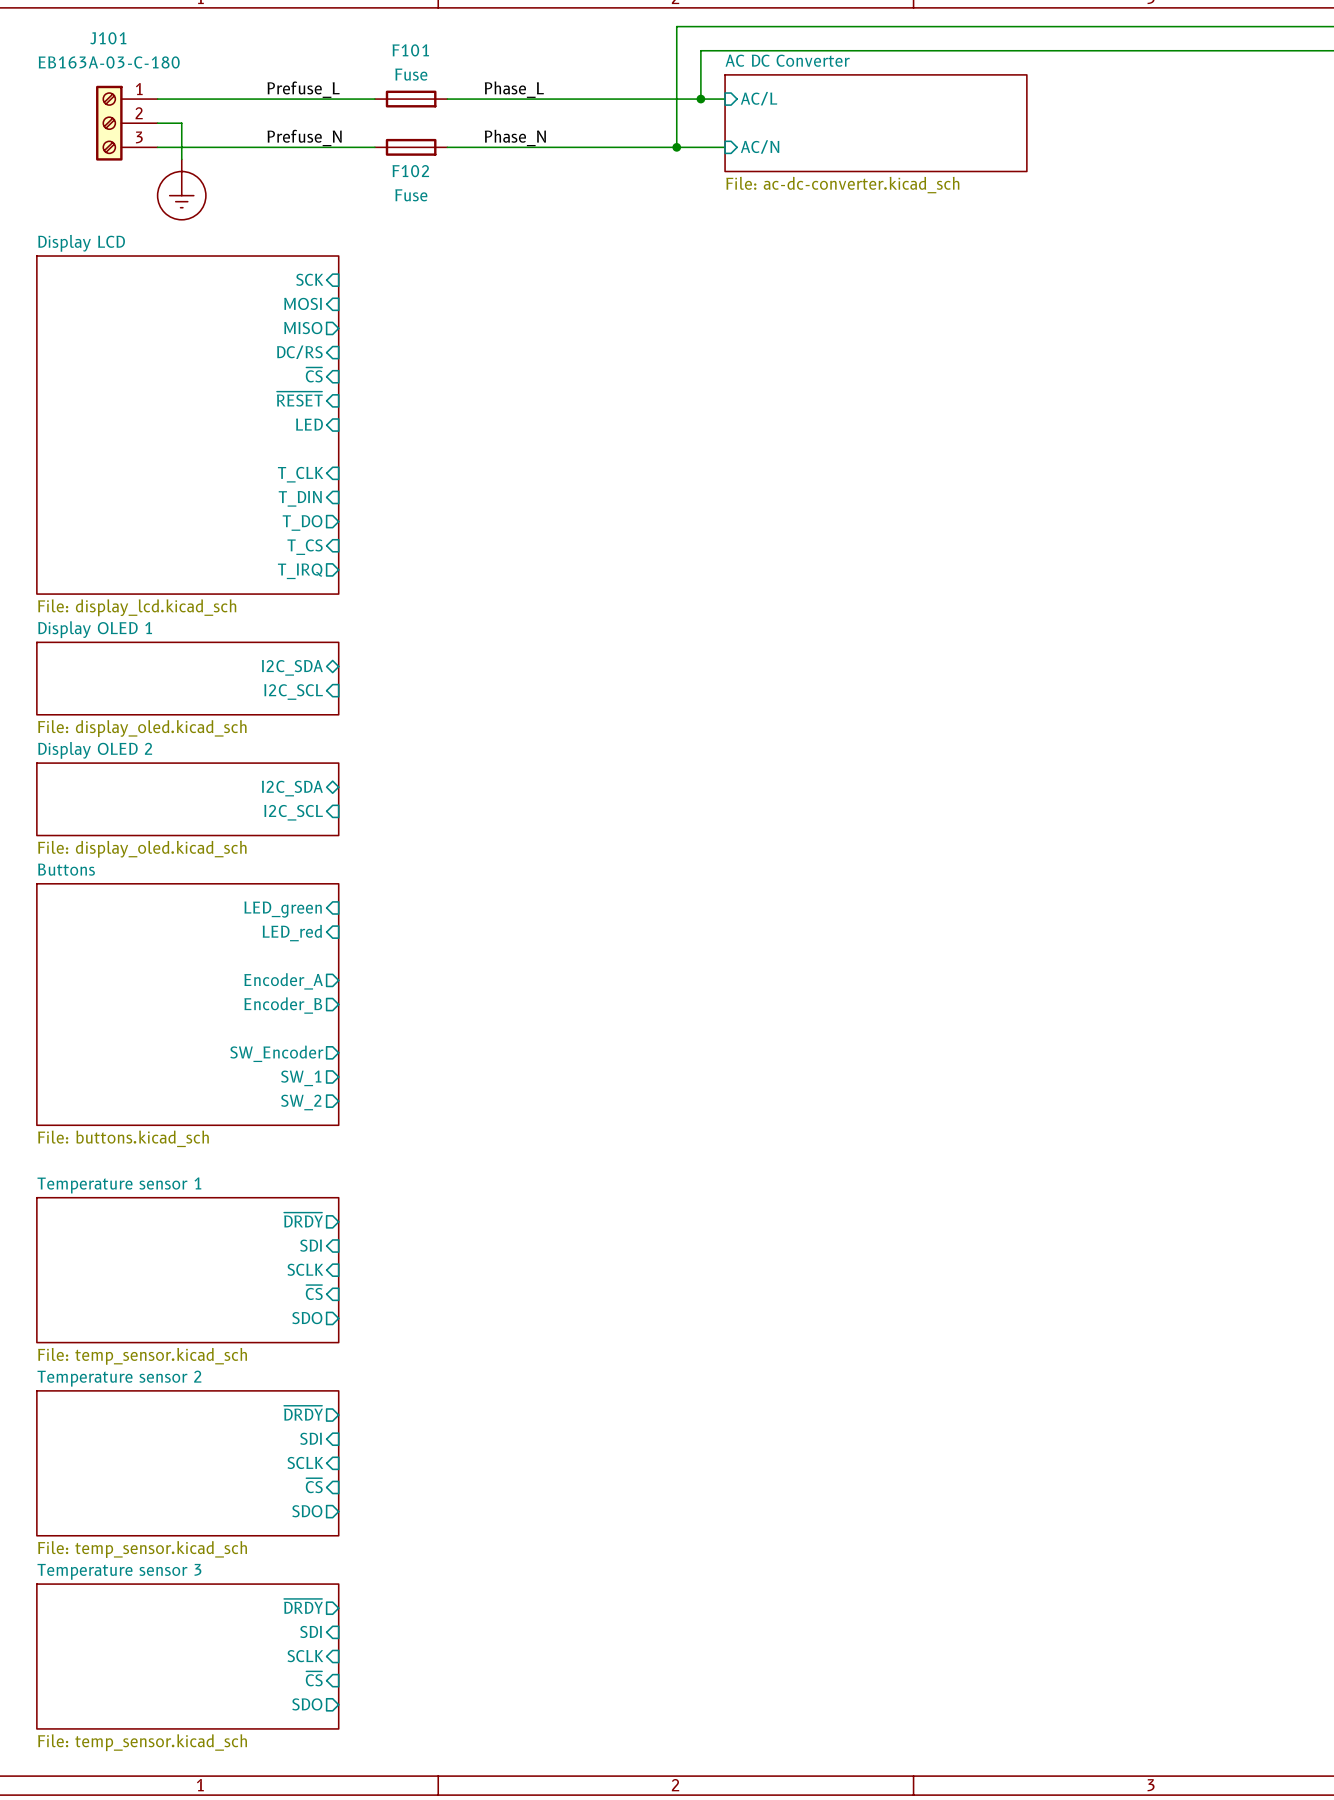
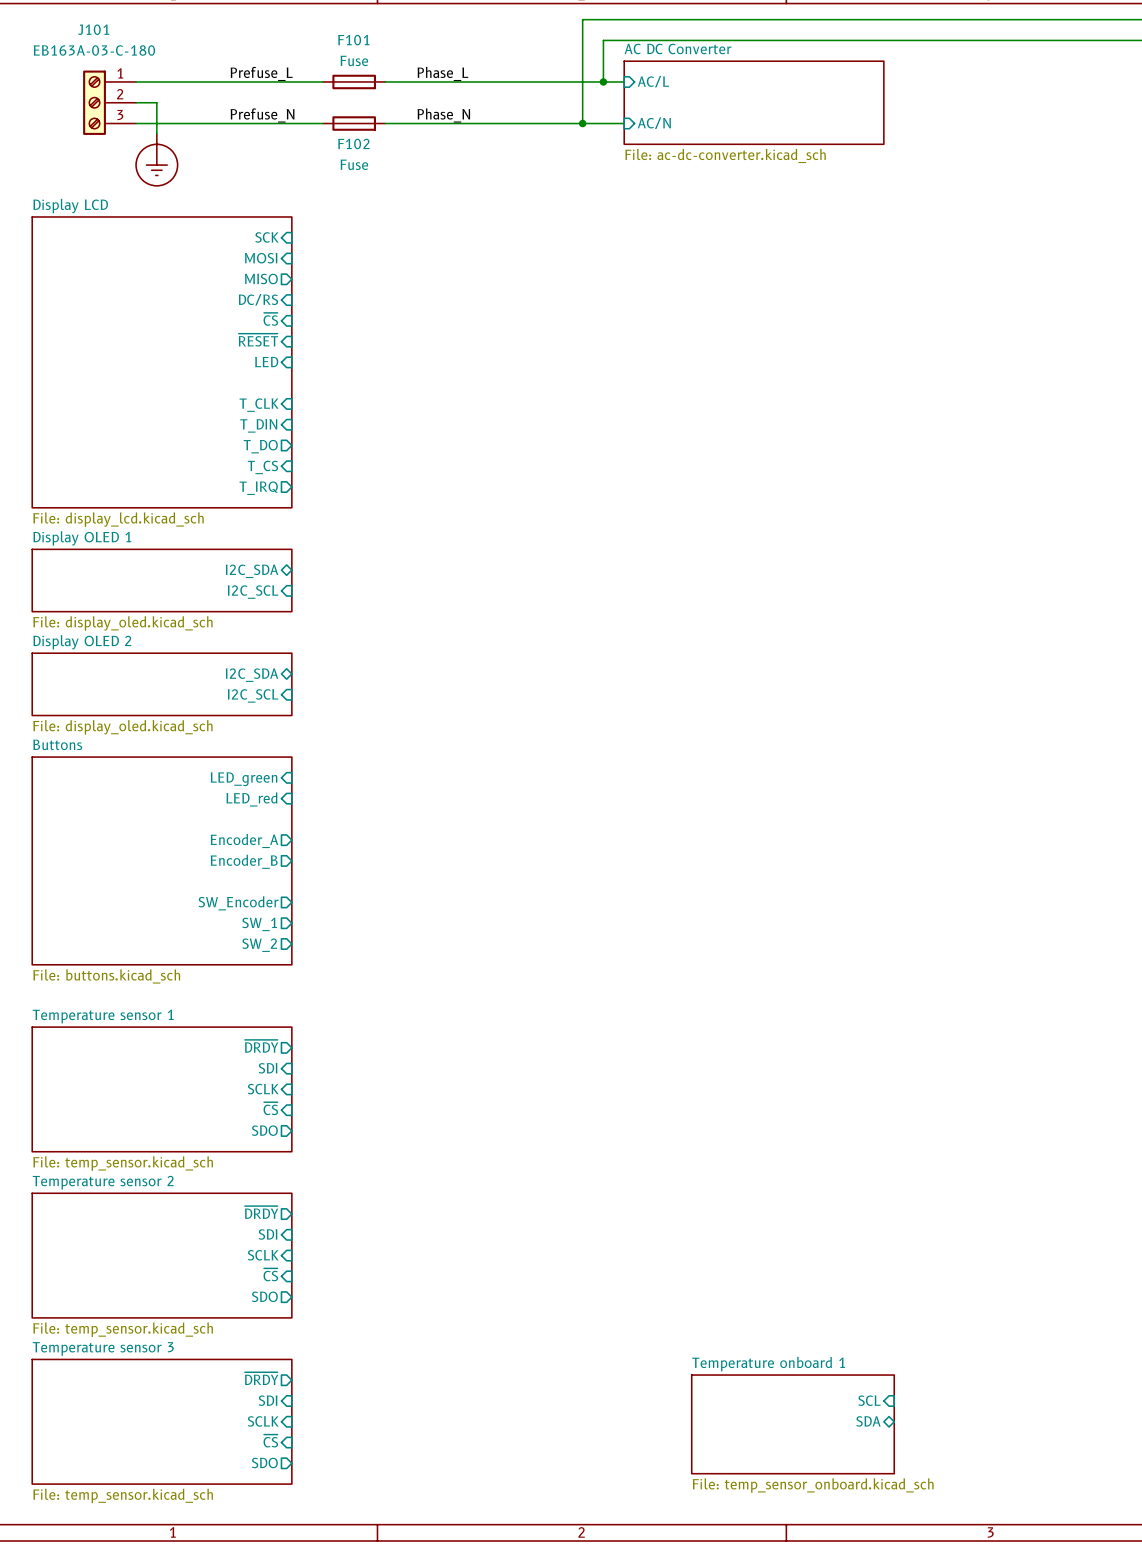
sheet pin: none -> SCL (869, 1400)
sheet pin: none -> SDA (868, 1421)
sheet Temperature onboard 1: none -> File: temp_sensor_onboard.kicad_sch (792, 1424)

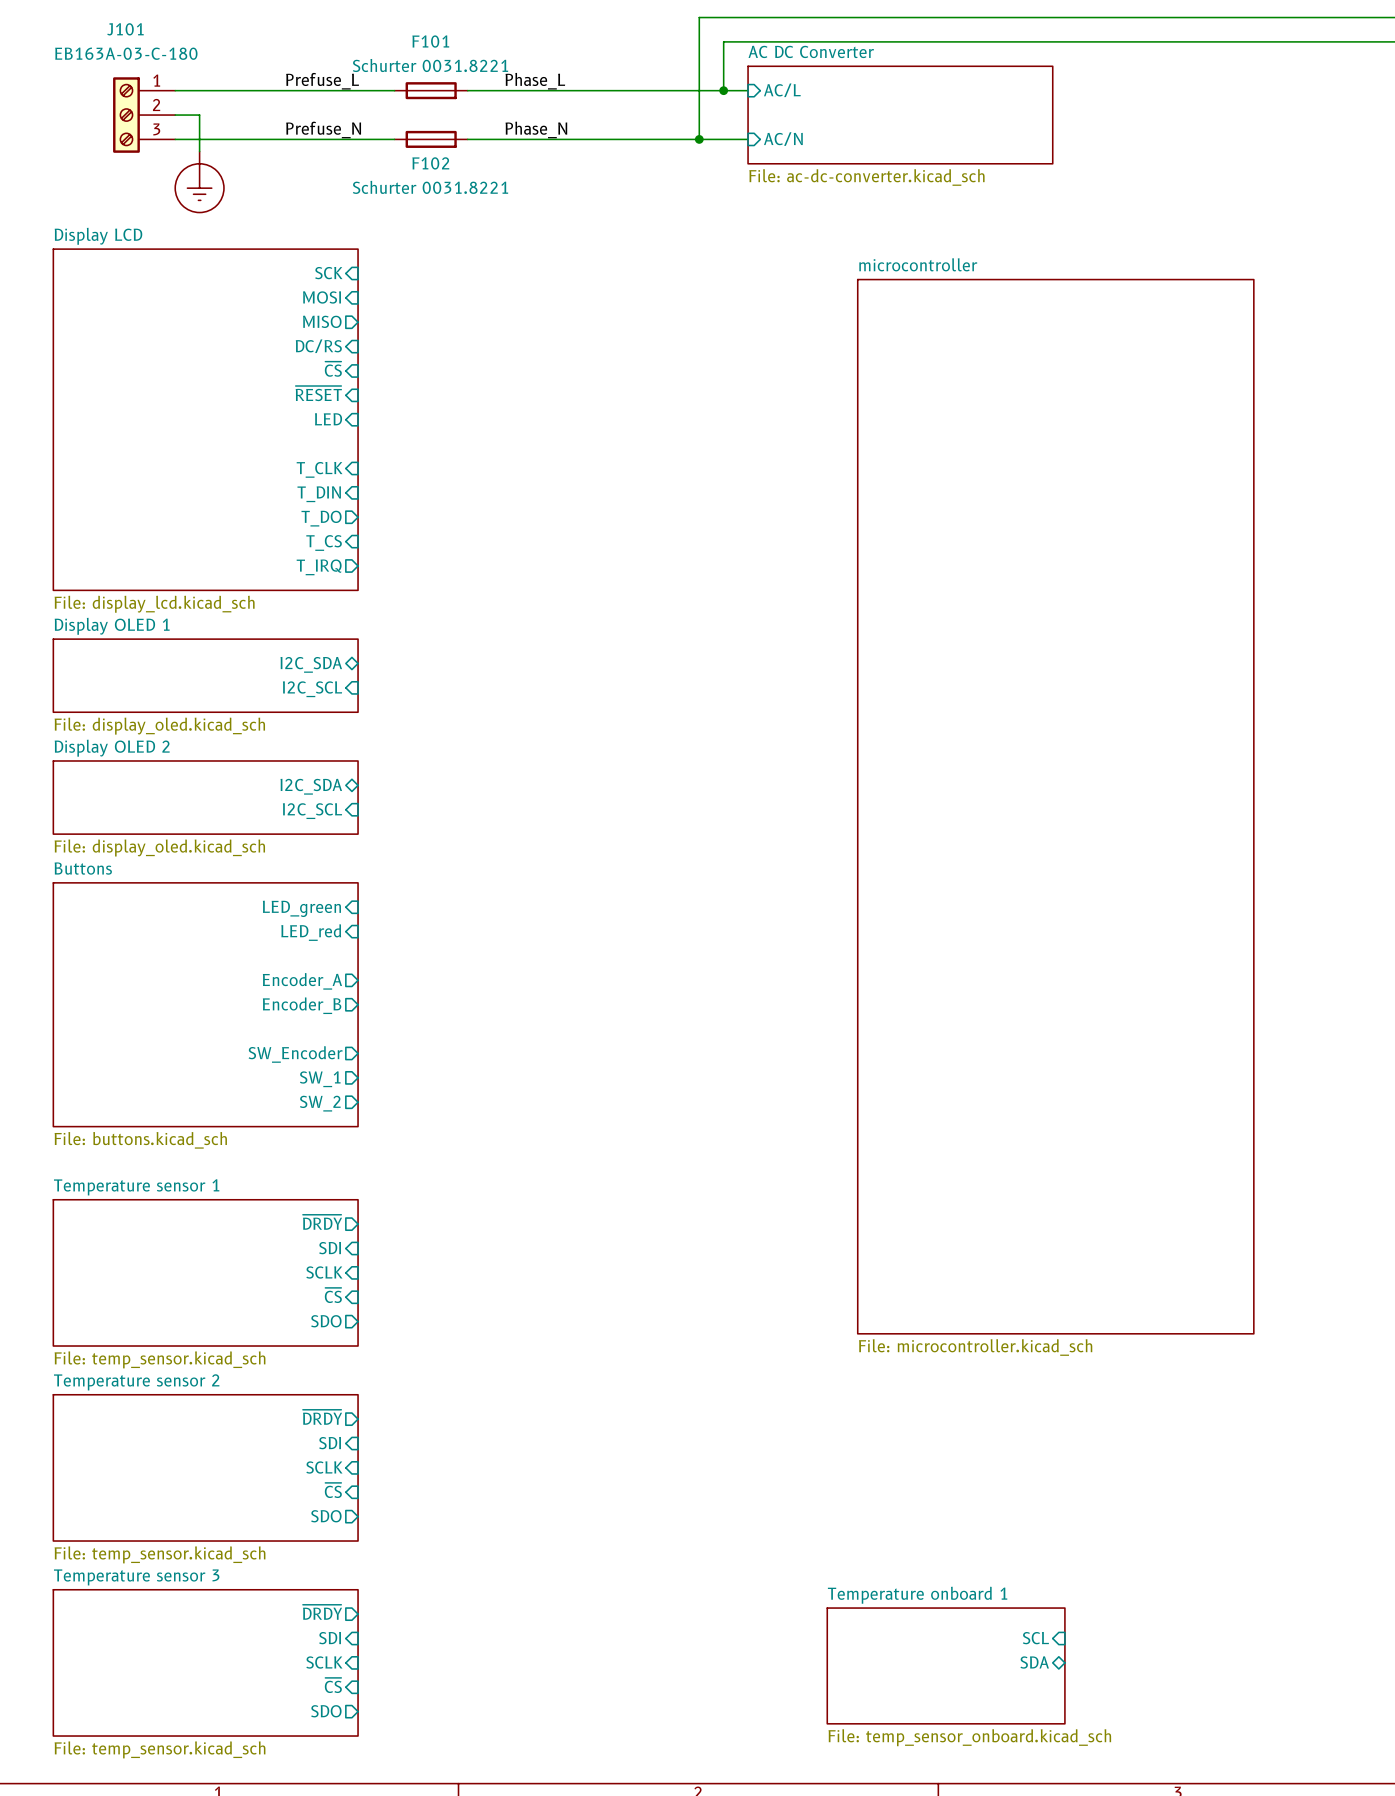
F101 value: Fuse (354, 60) -> Schurter 0031.8221 (430, 65)
F102 value: Fuse (354, 164) -> Schurter 0031.8221 (430, 187)
sheet microcontroller: none -> File: microcontroller.kicad_sch (1055, 806)

